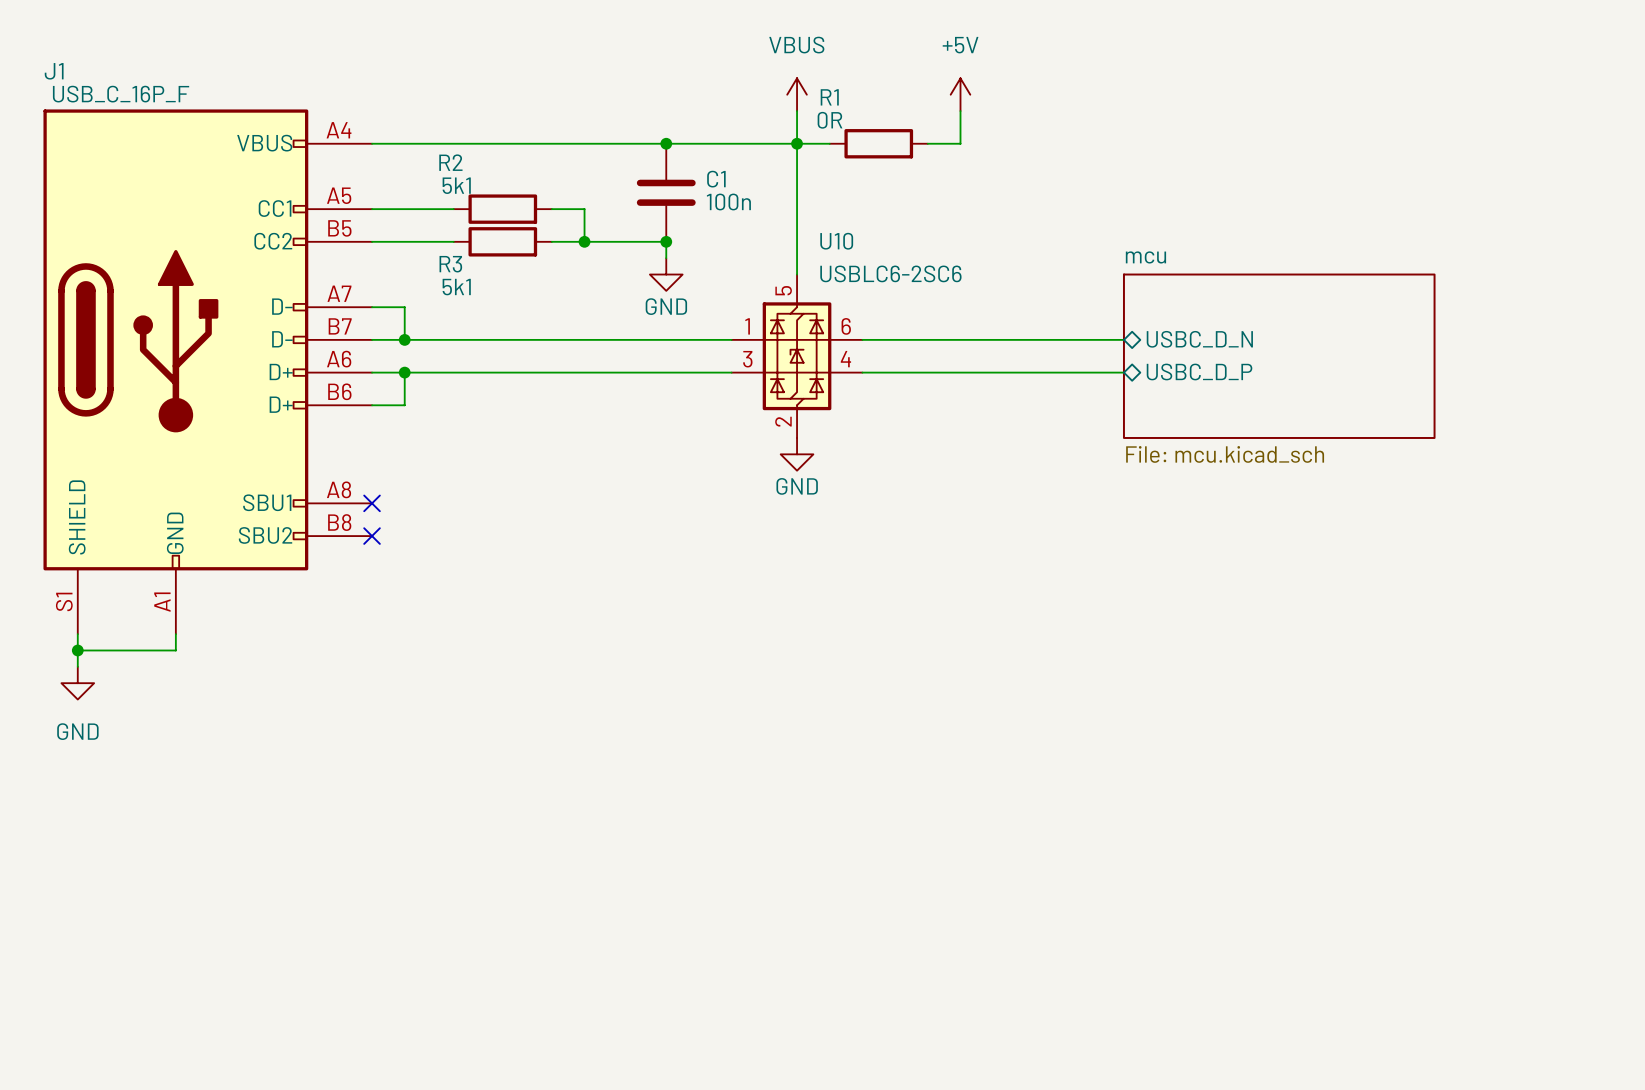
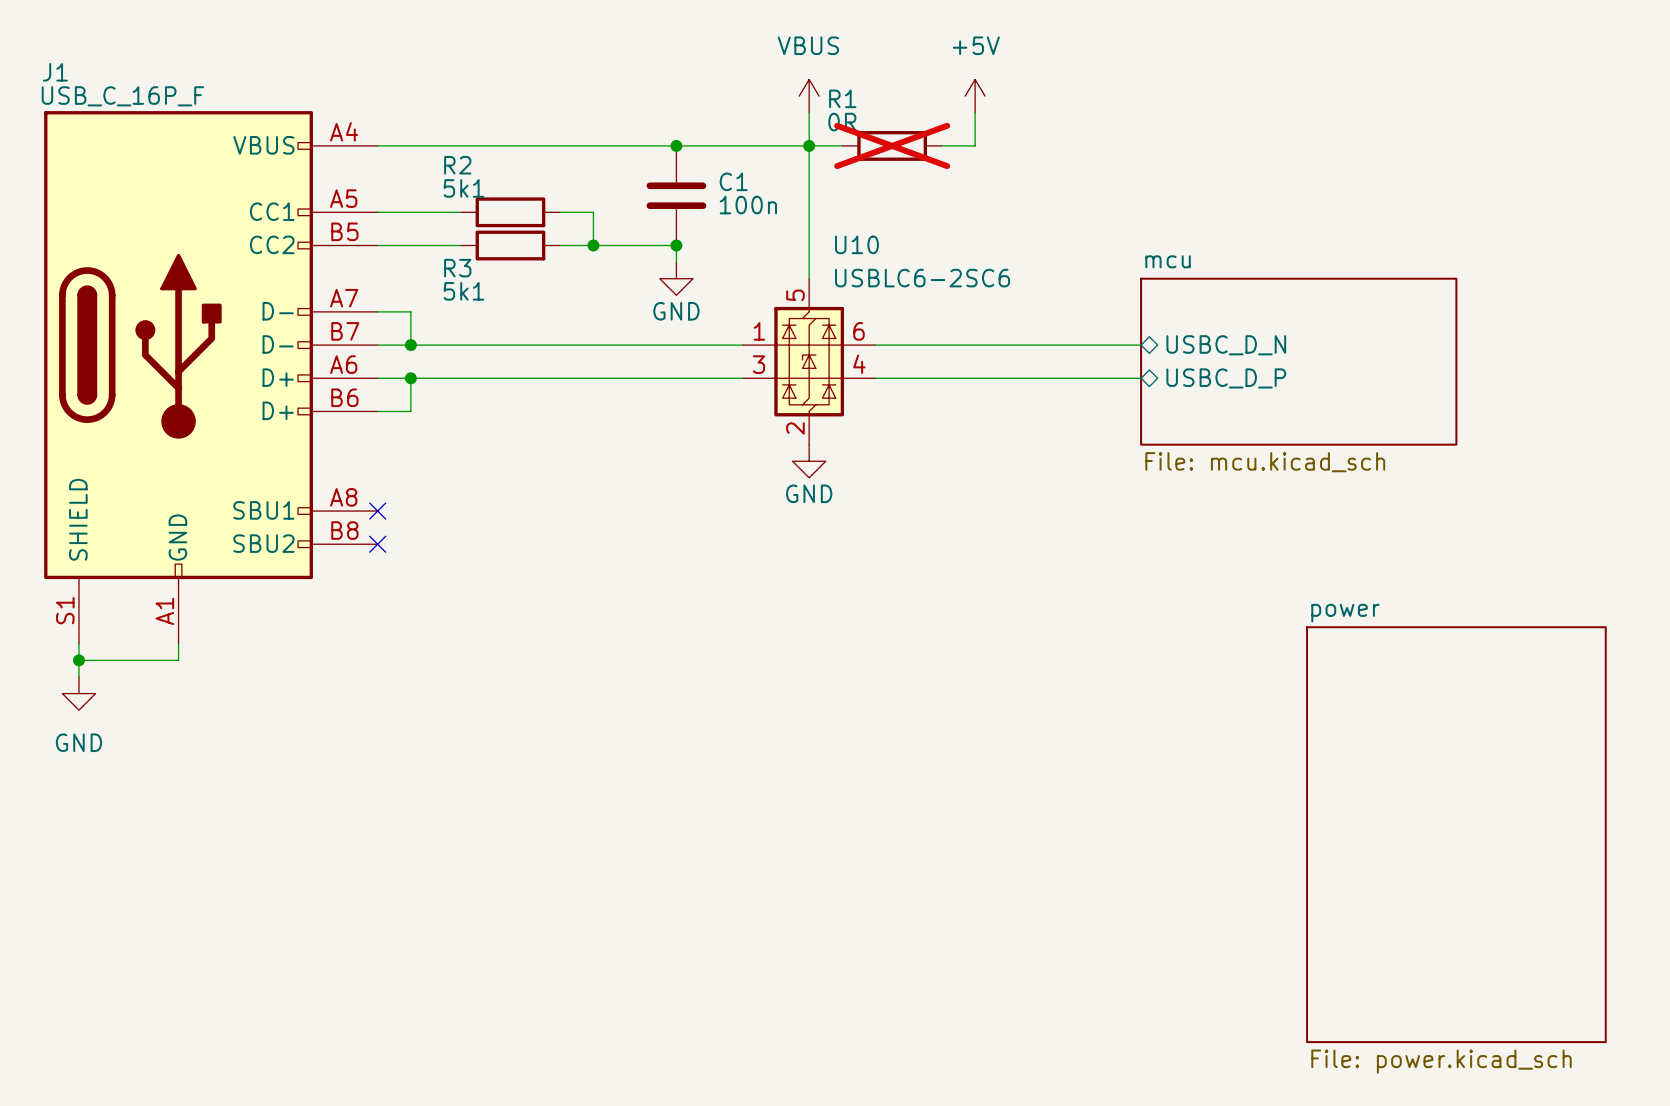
R1 do-not-place cross: none -> (892, 145)
sheet power: none -> File: power.kicad_sch (1456, 834)

